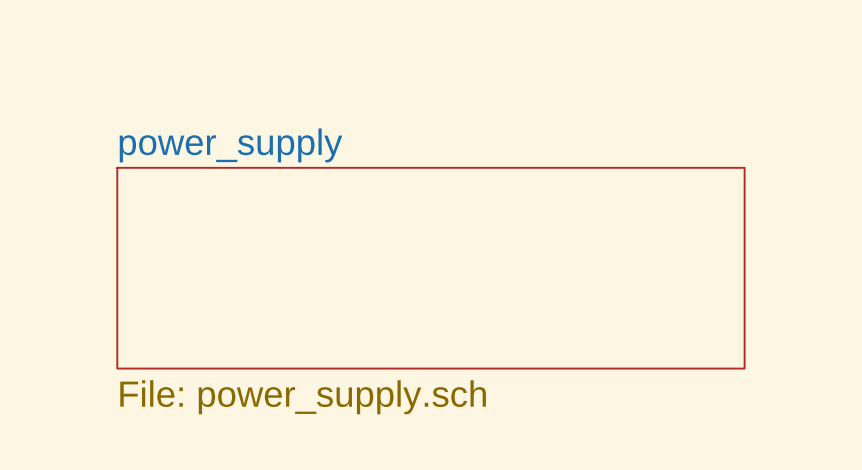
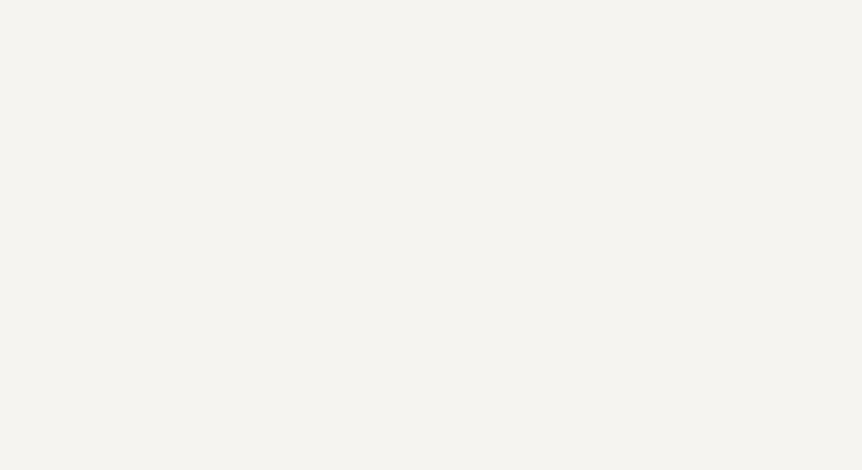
sheet power_supply: File: power_supply.sch (430, 268) -> none

